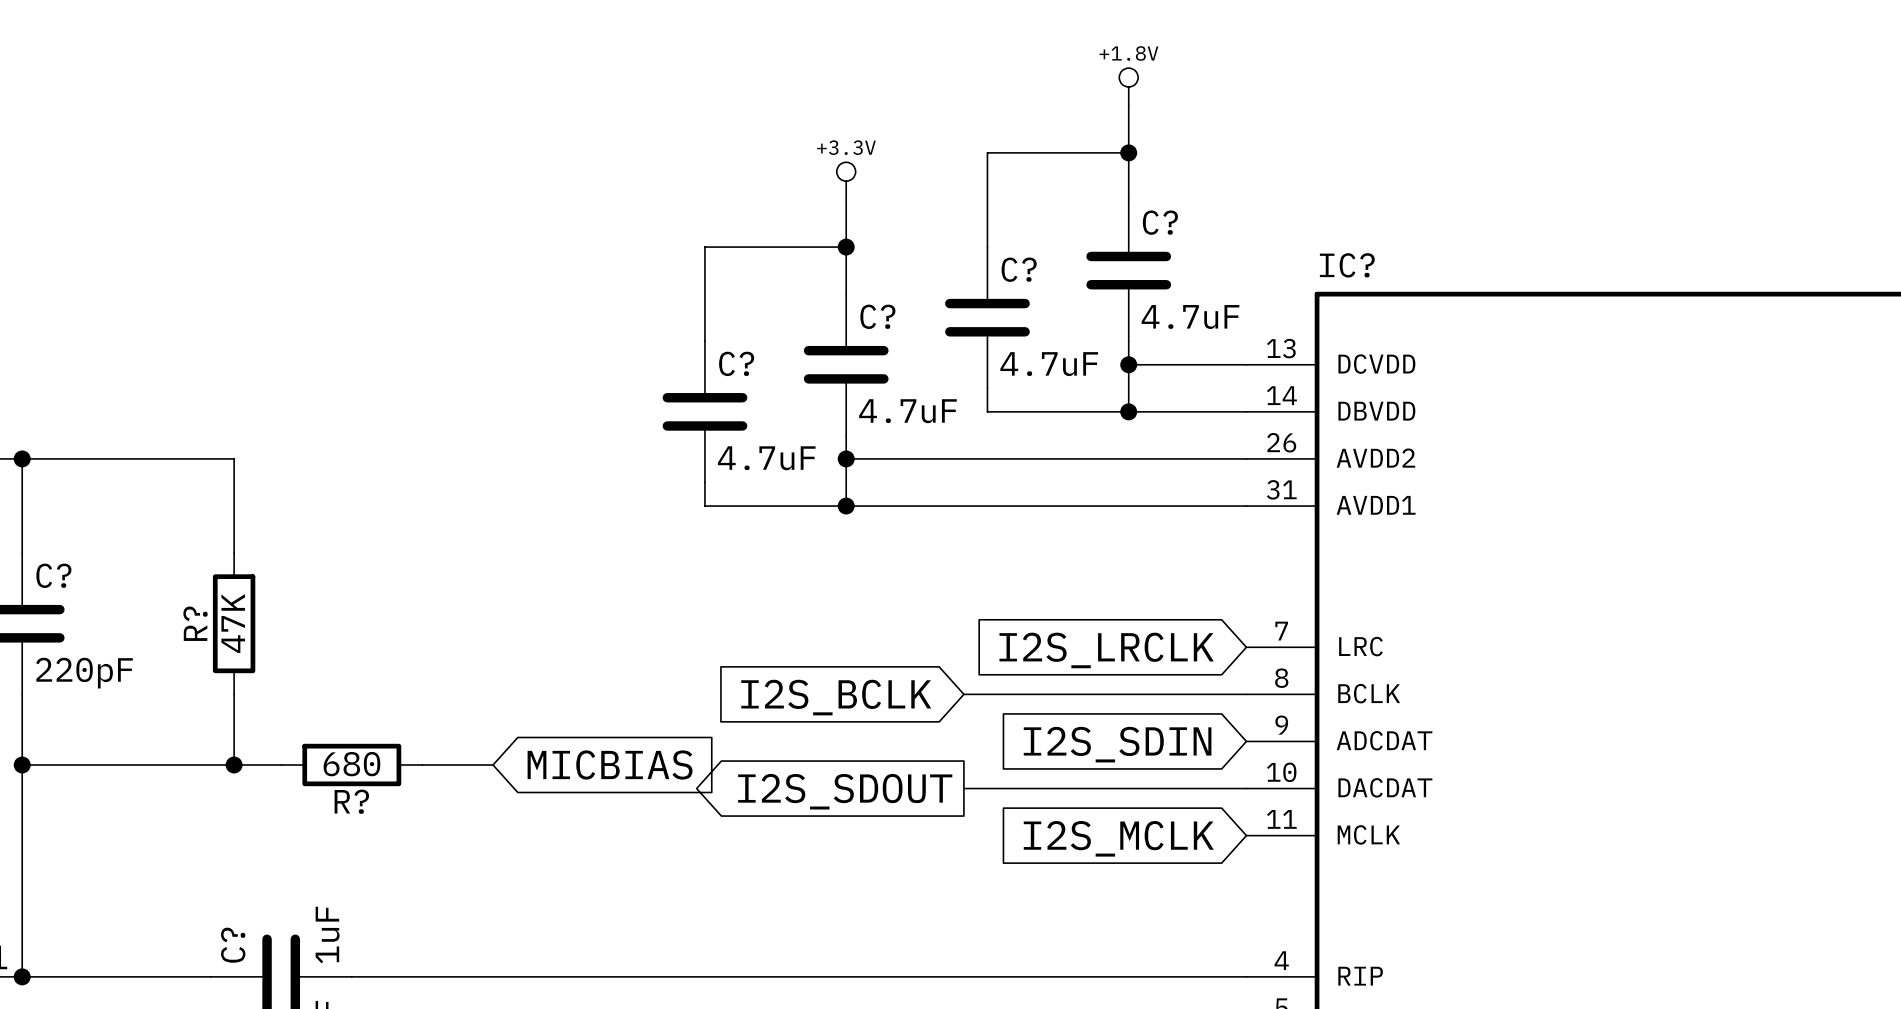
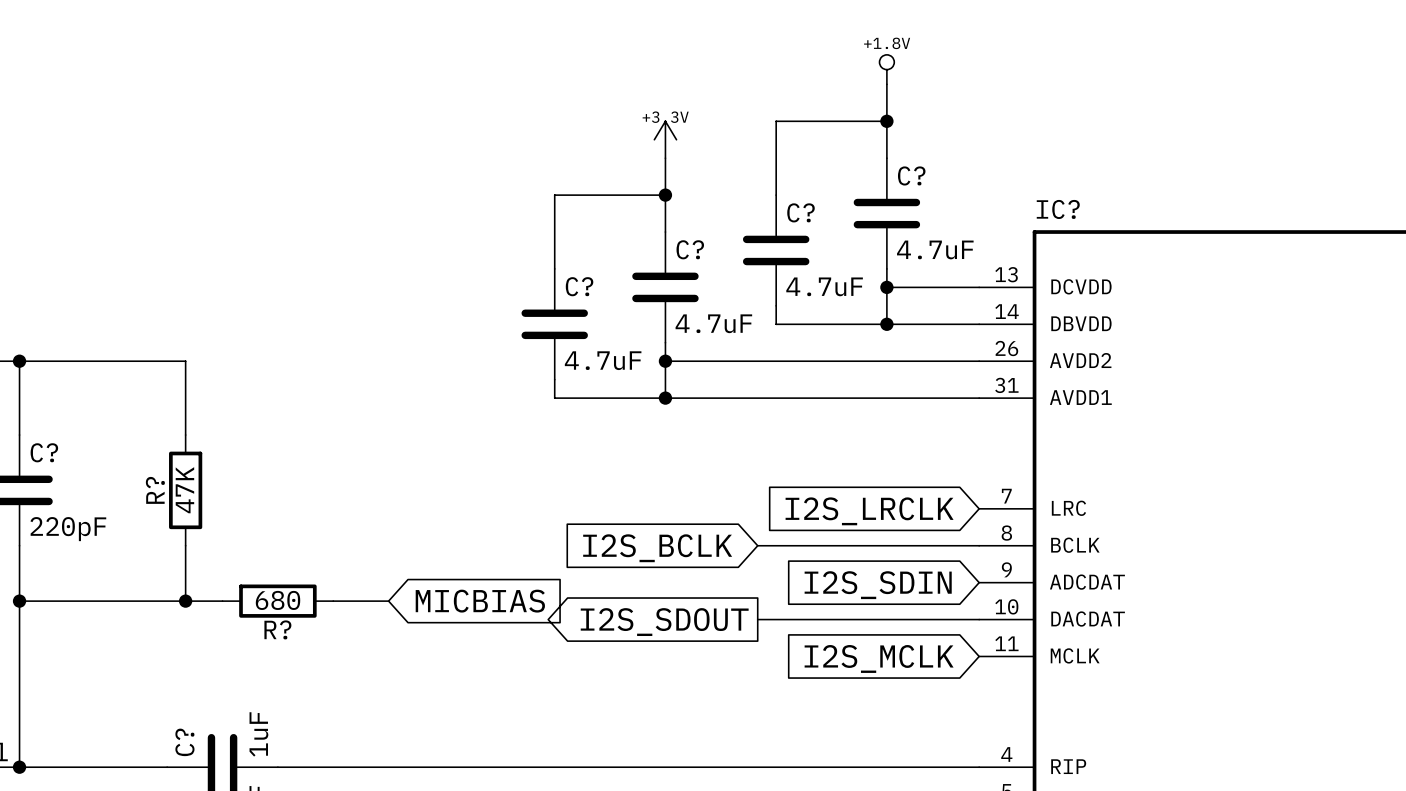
power symbol shape: [836, 162, 856, 200] -> [654, 121, 677, 159]

